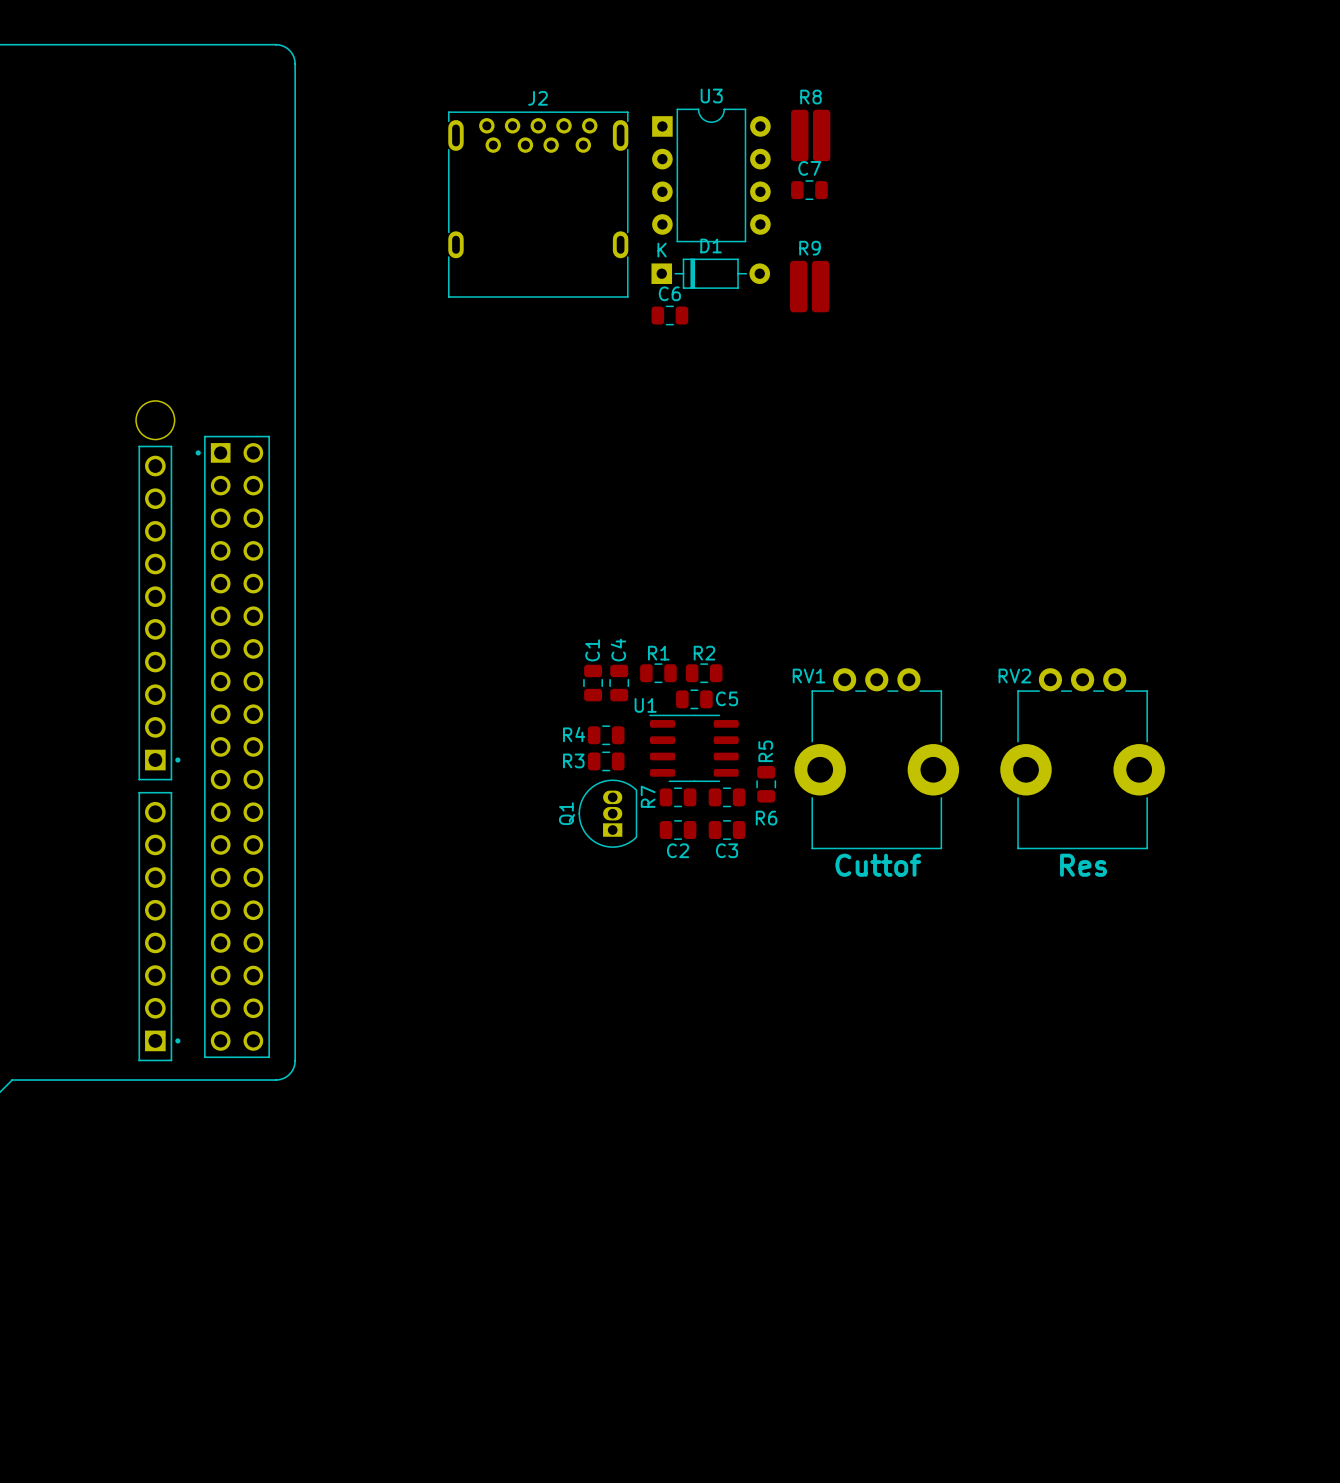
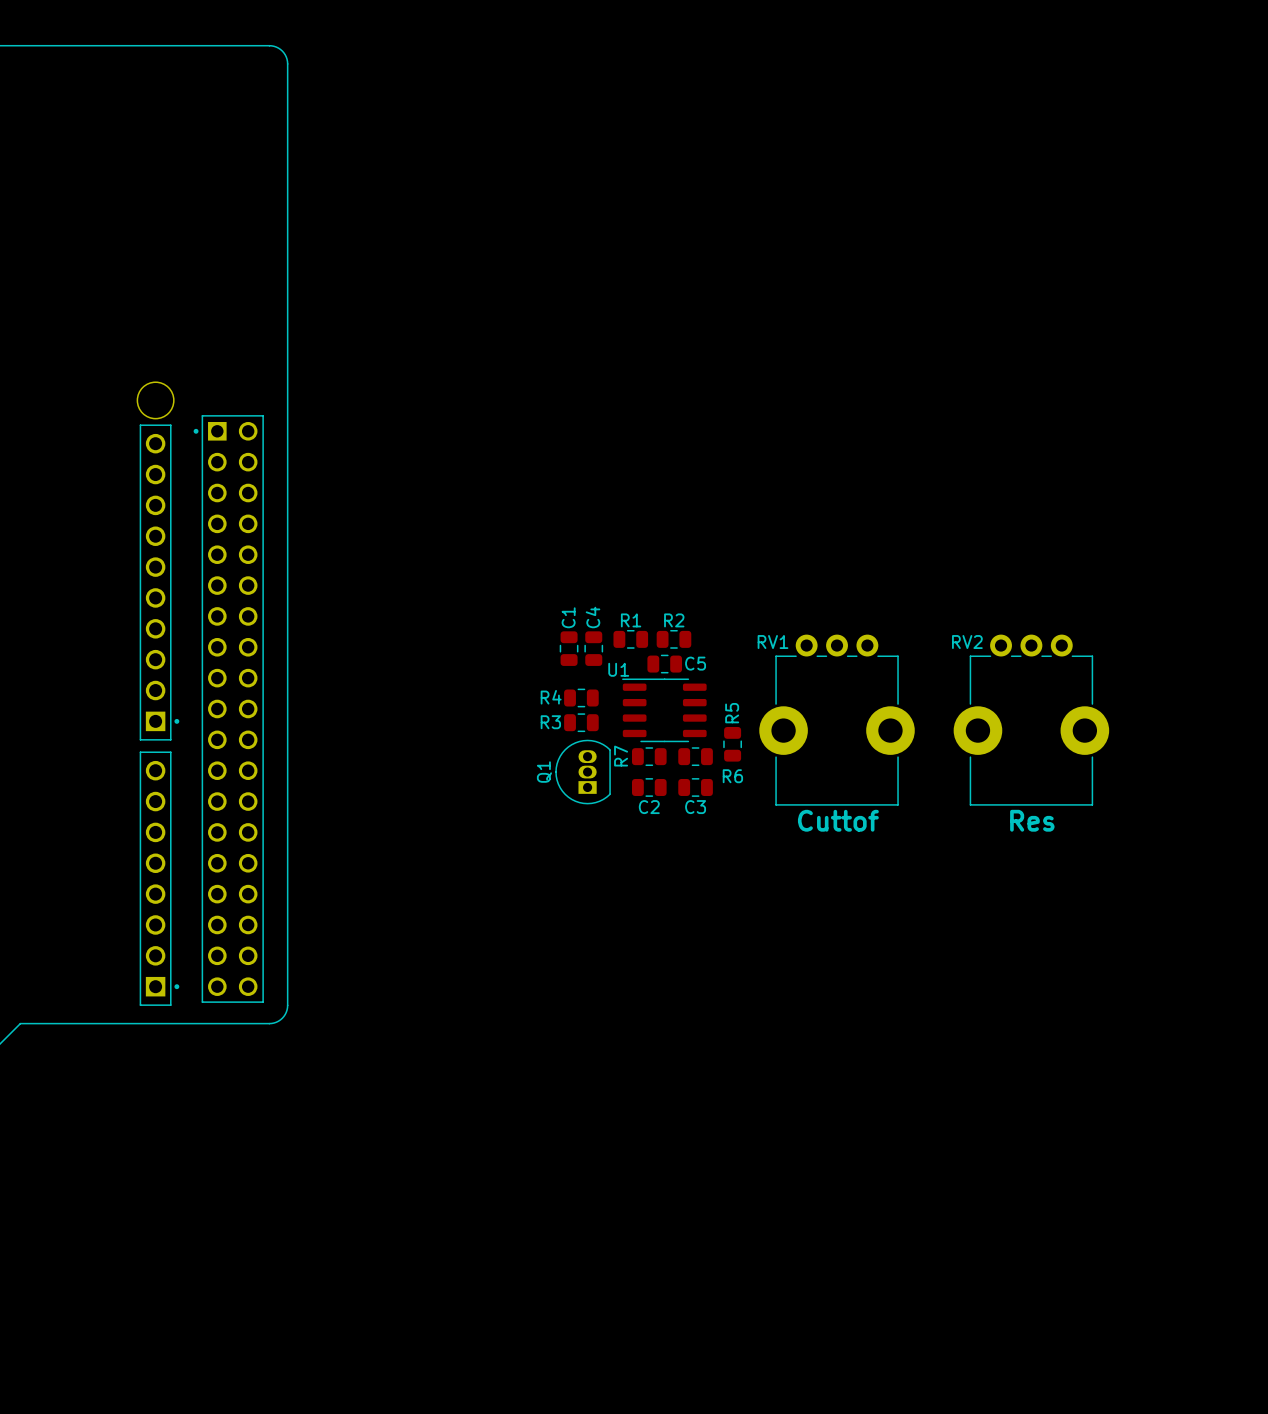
R8: (810, 135) -> none
U3: (711, 175) -> none
C7: (809, 190) -> none
J2: (538, 204) -> none
D1: (710, 273) -> none
R9: (809, 286) -> none
C6: (669, 315) -> none

